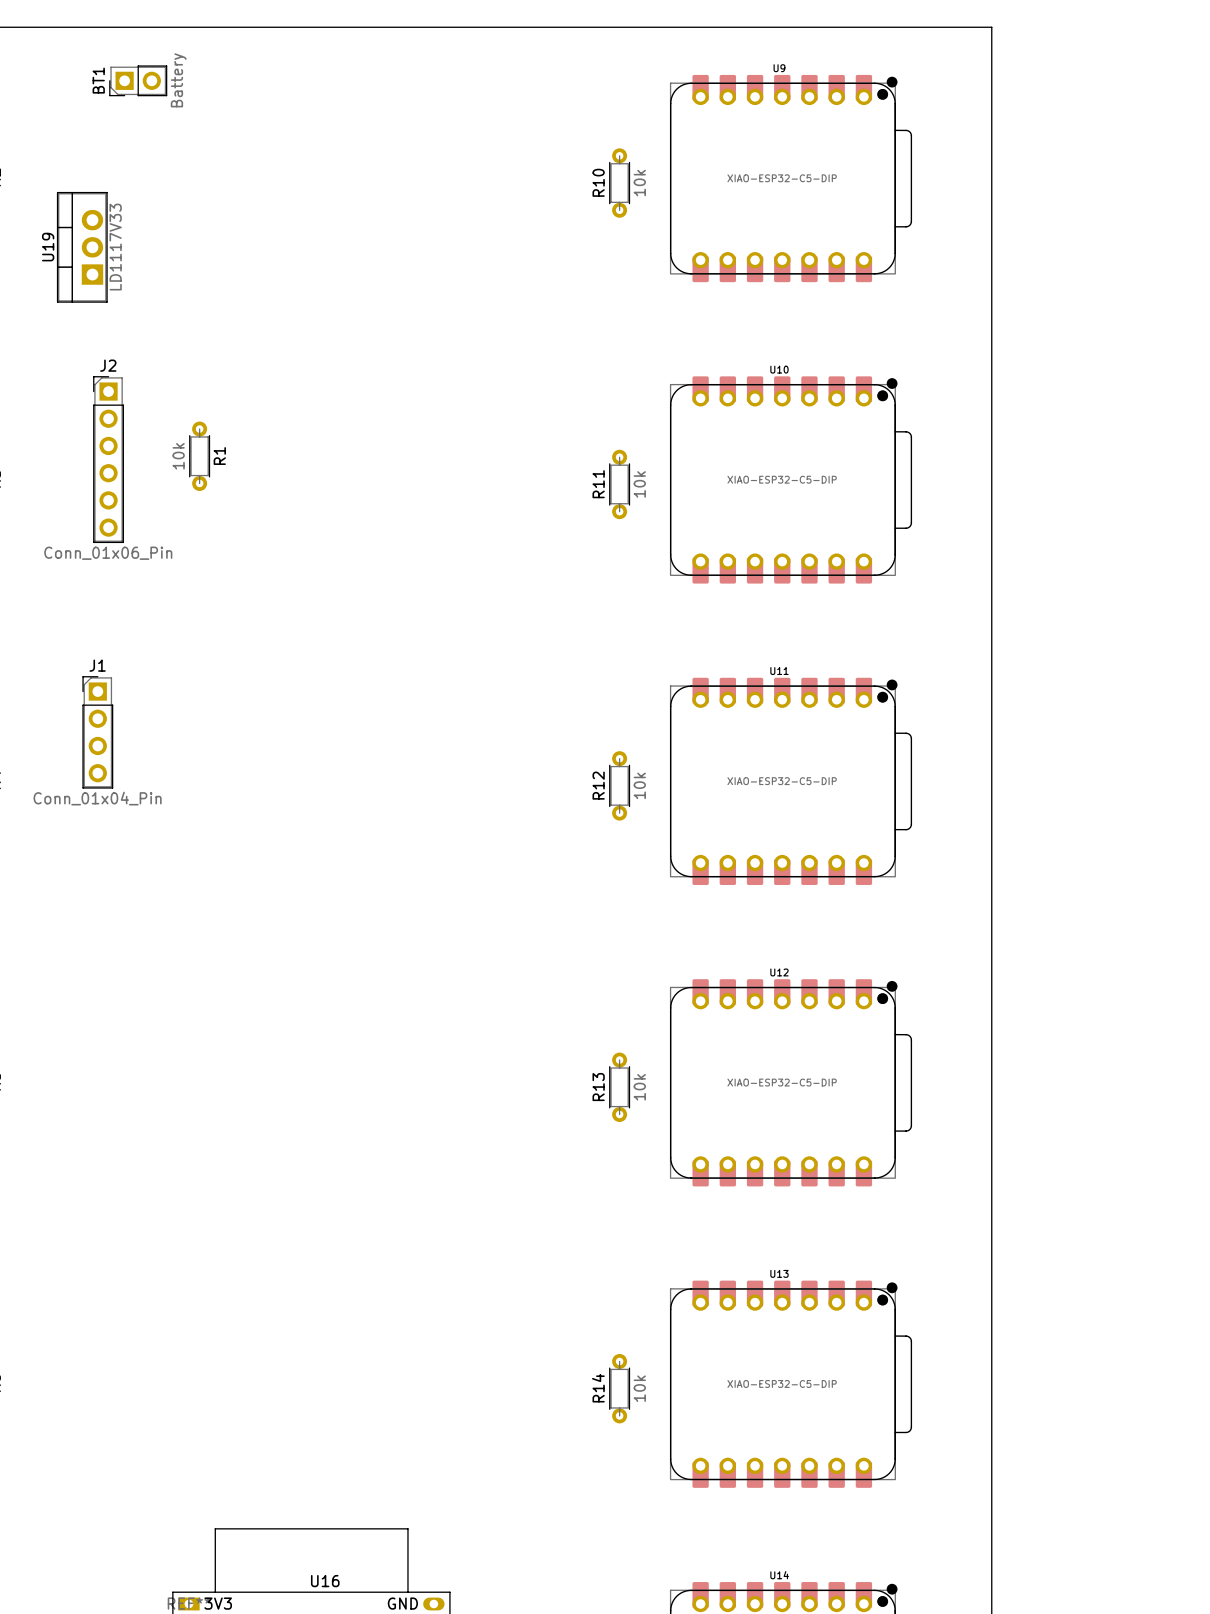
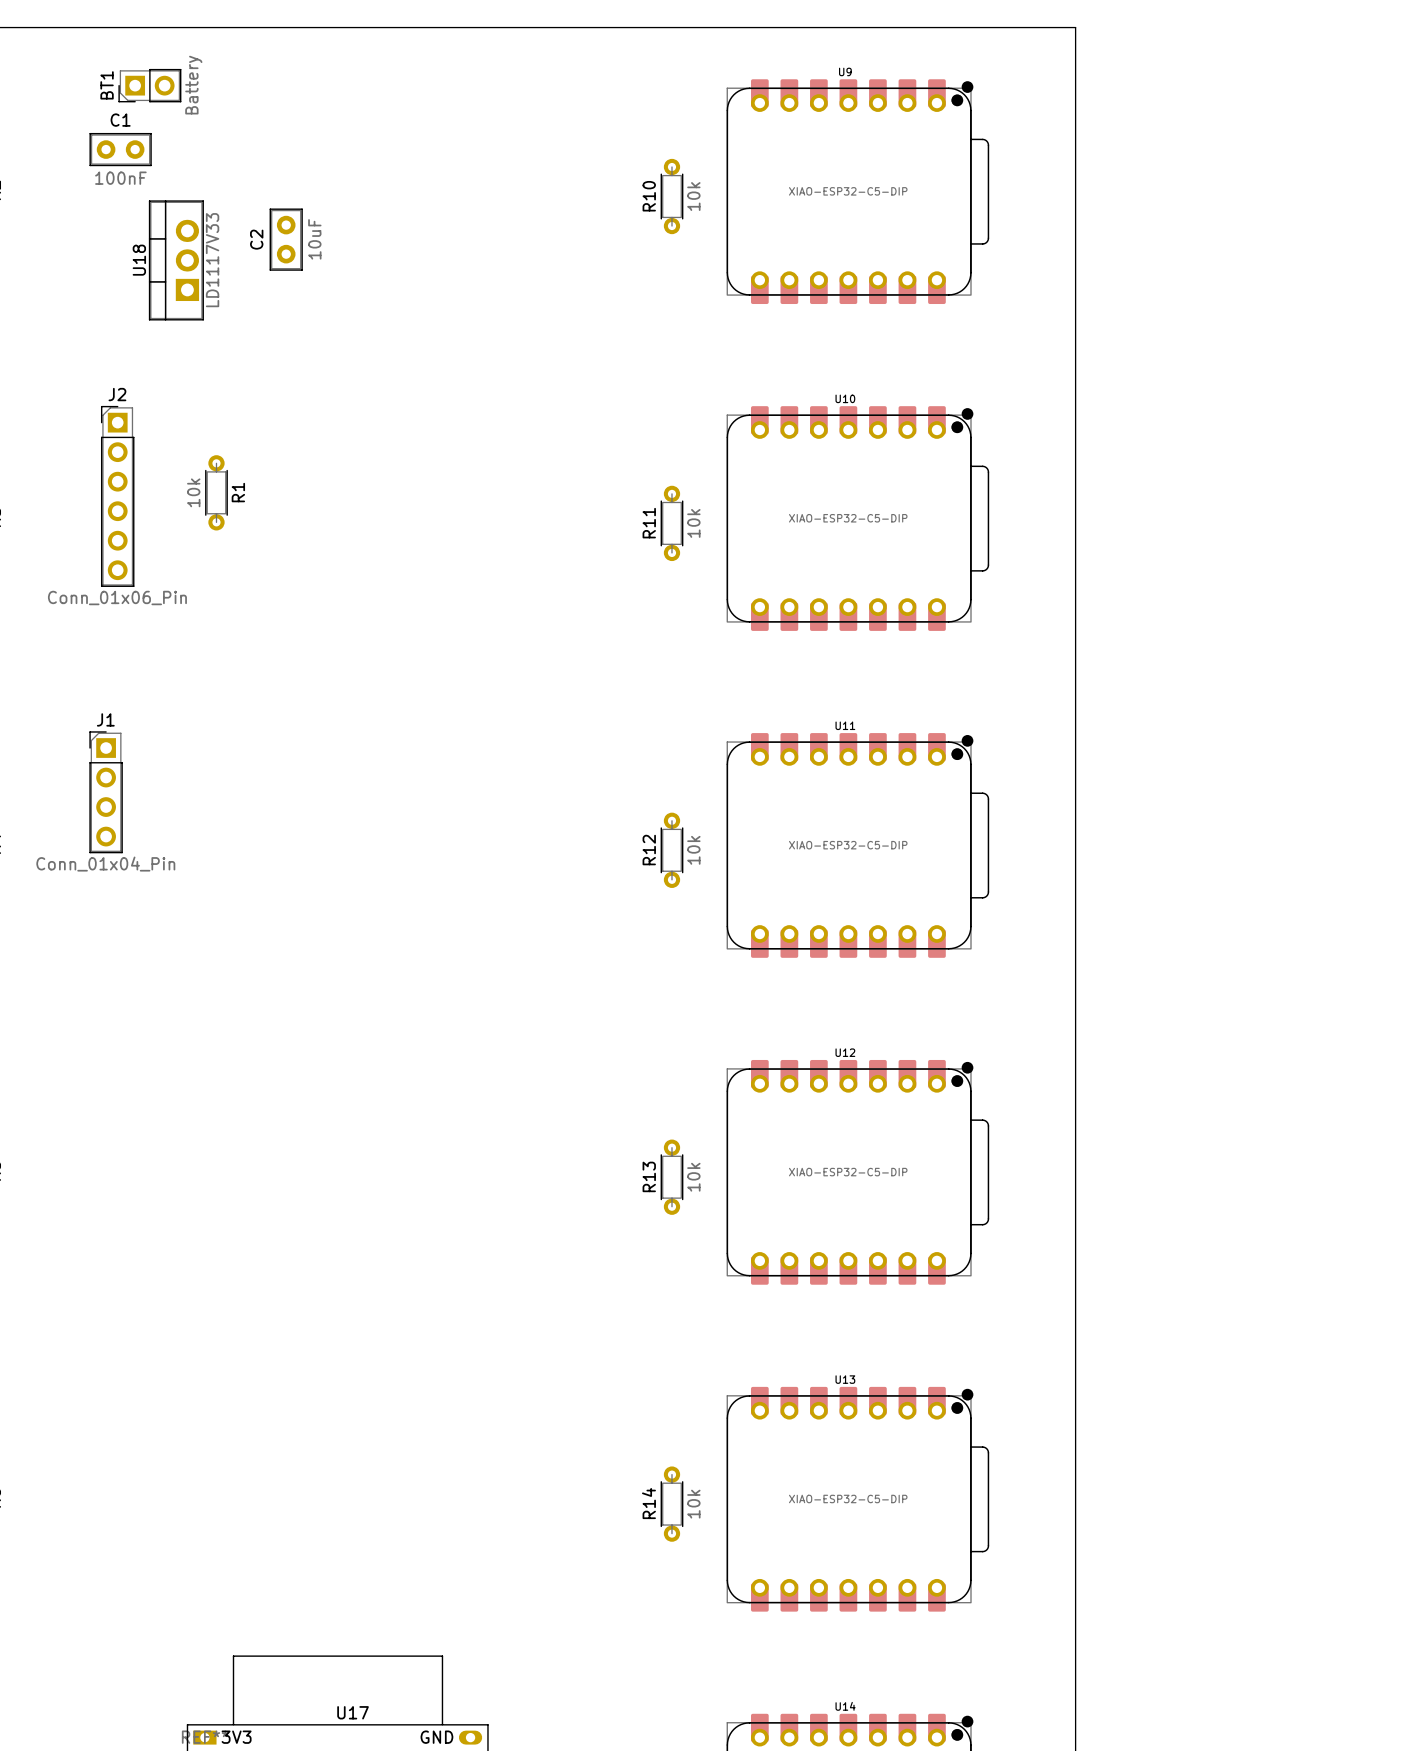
C1: none -> 100nF (120, 149)
C2: none -> 10uF (286, 239)
U18: none -> LD1117V33 (176, 260)
U19: LD1117V33 (82, 247) -> none
U16 name: U16 (325, 1581) -> U17 (353, 1712)

